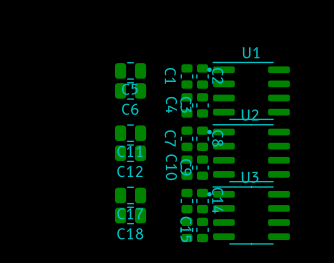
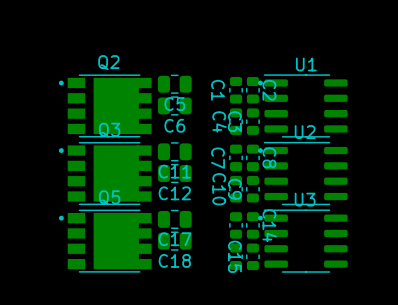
Q2: none -> (108, 62)
part: none -> (105, 105)
Q3: none -> (105, 173)
Q5: none -> (105, 241)

